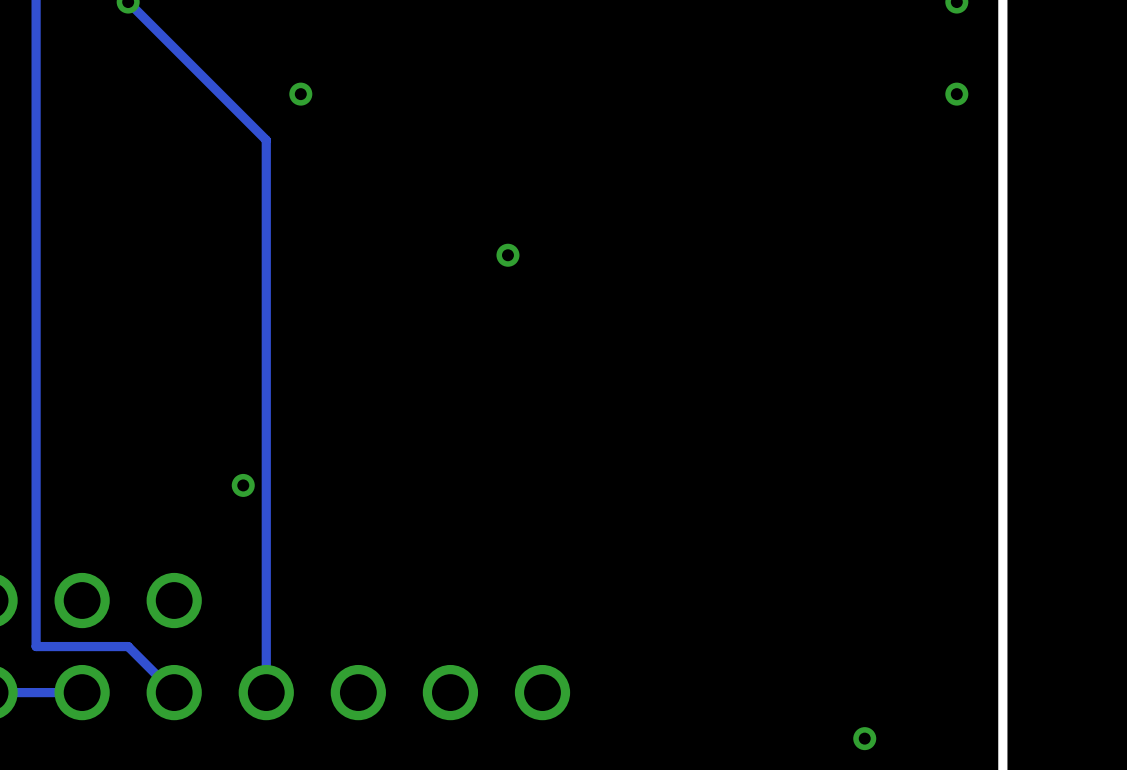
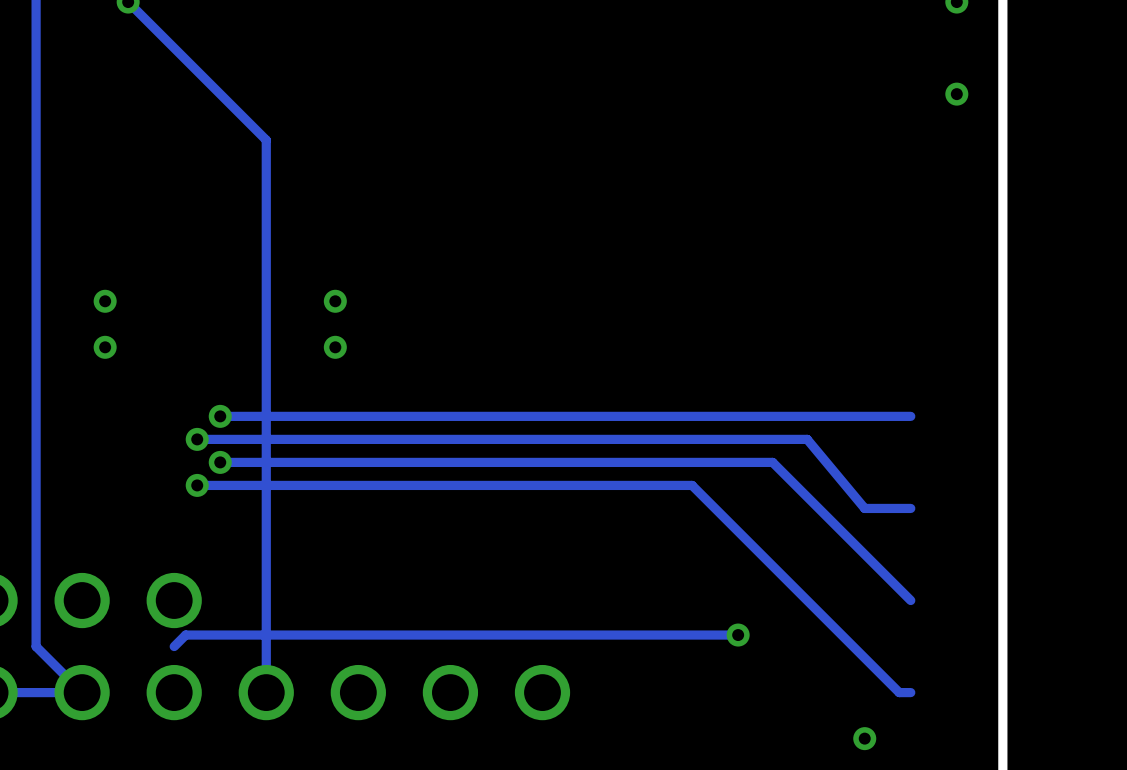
via: (300, 94) -> none
via: (507, 255) -> none
via: none -> (105, 301)
via: none -> (335, 301)
via: none -> (105, 347)
via: none -> (335, 347)
via: none -> (220, 416)
track: none -> (910, 416) (220, 416)
track: none -> (197, 439) (807, 439) (864, 508) (910, 508)
via: none -> (197, 439)
track: none -> (220, 462) (772, 462) (910, 600)
via: none -> (220, 462)
track: none -> (197, 485) (692, 485) (899, 692) (910, 692)
via: none -> (197, 485)
via: (243, 485) -> none
track: none -> (738, 635) (185, 635) (174, 646)
via: none -> (738, 635)
track: (36, 646) (128, 646) (174, 692) -> (36, 646) (82, 692)

